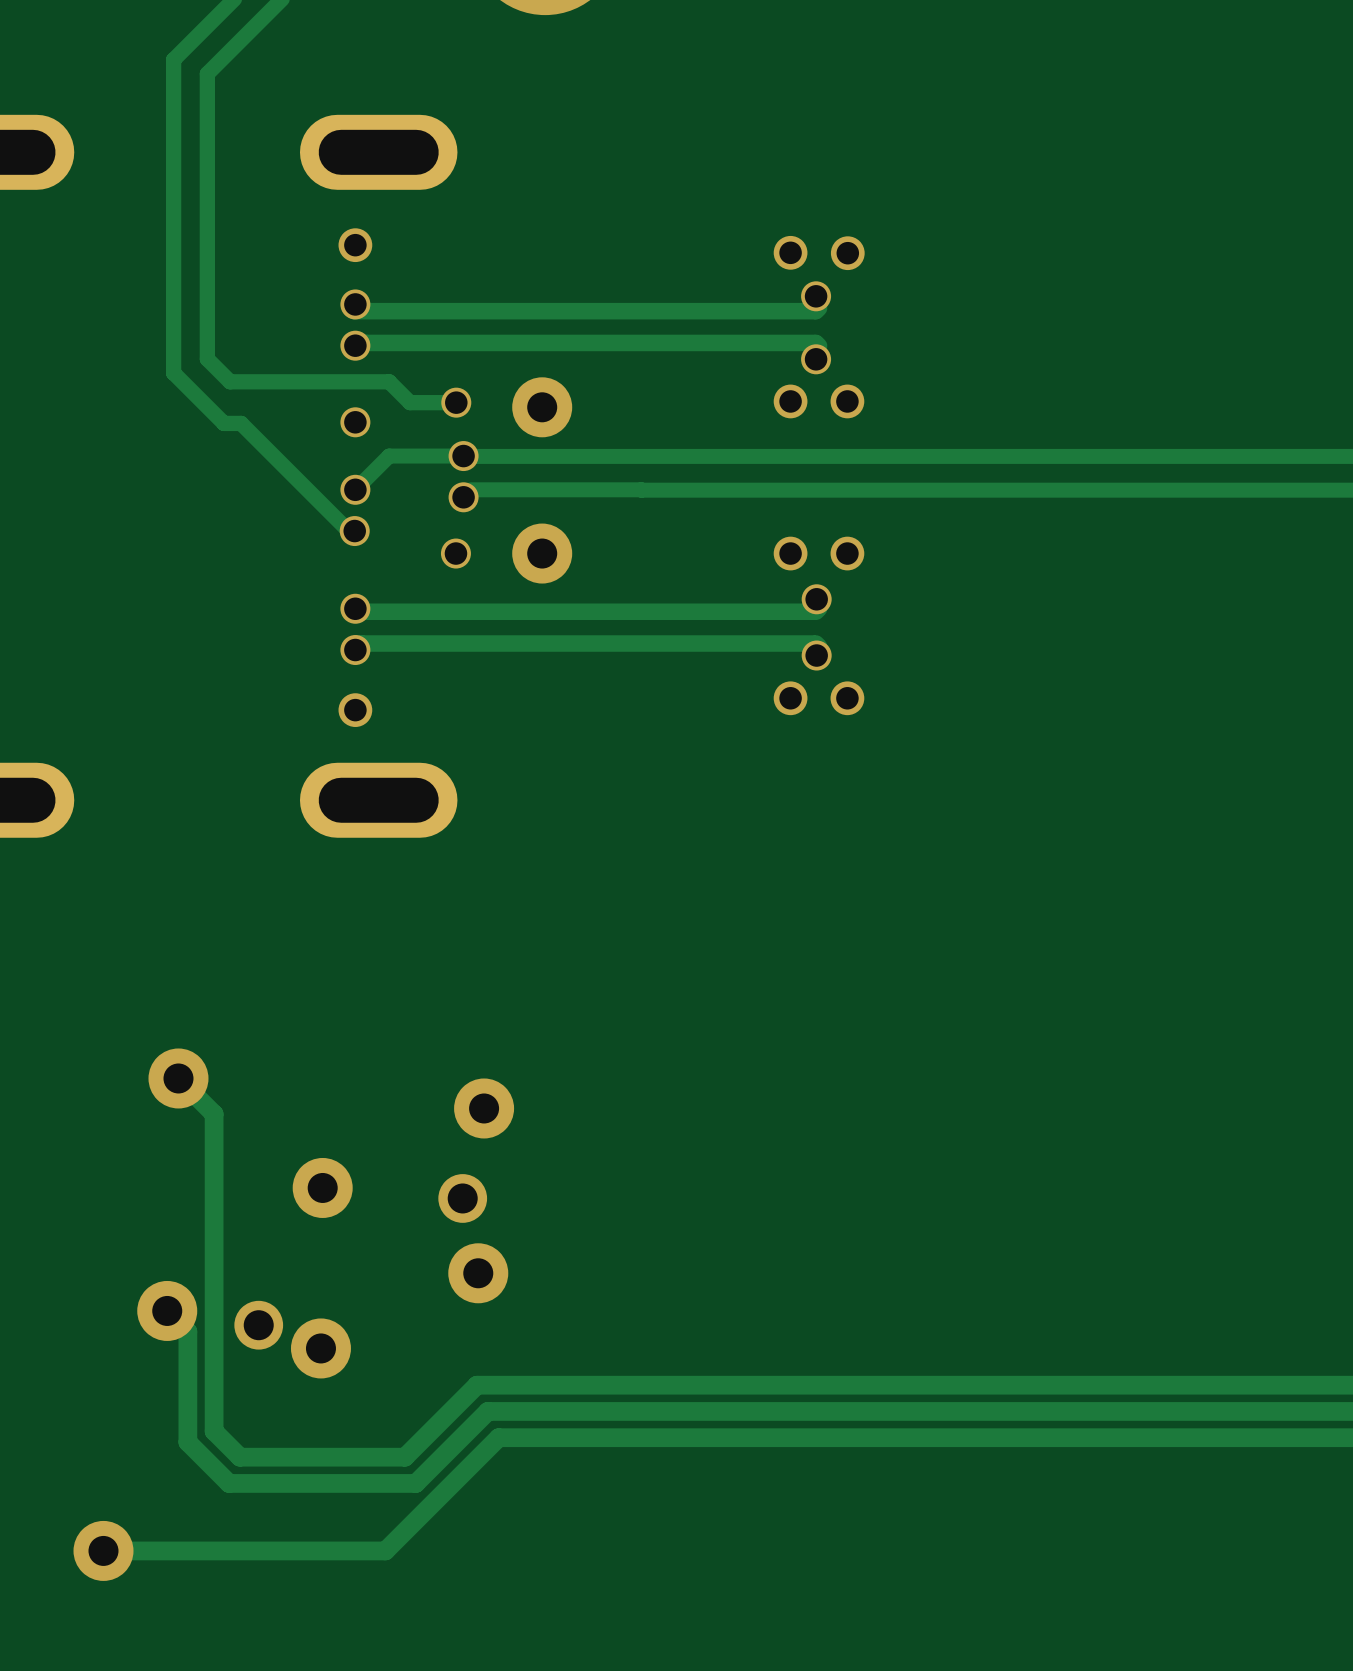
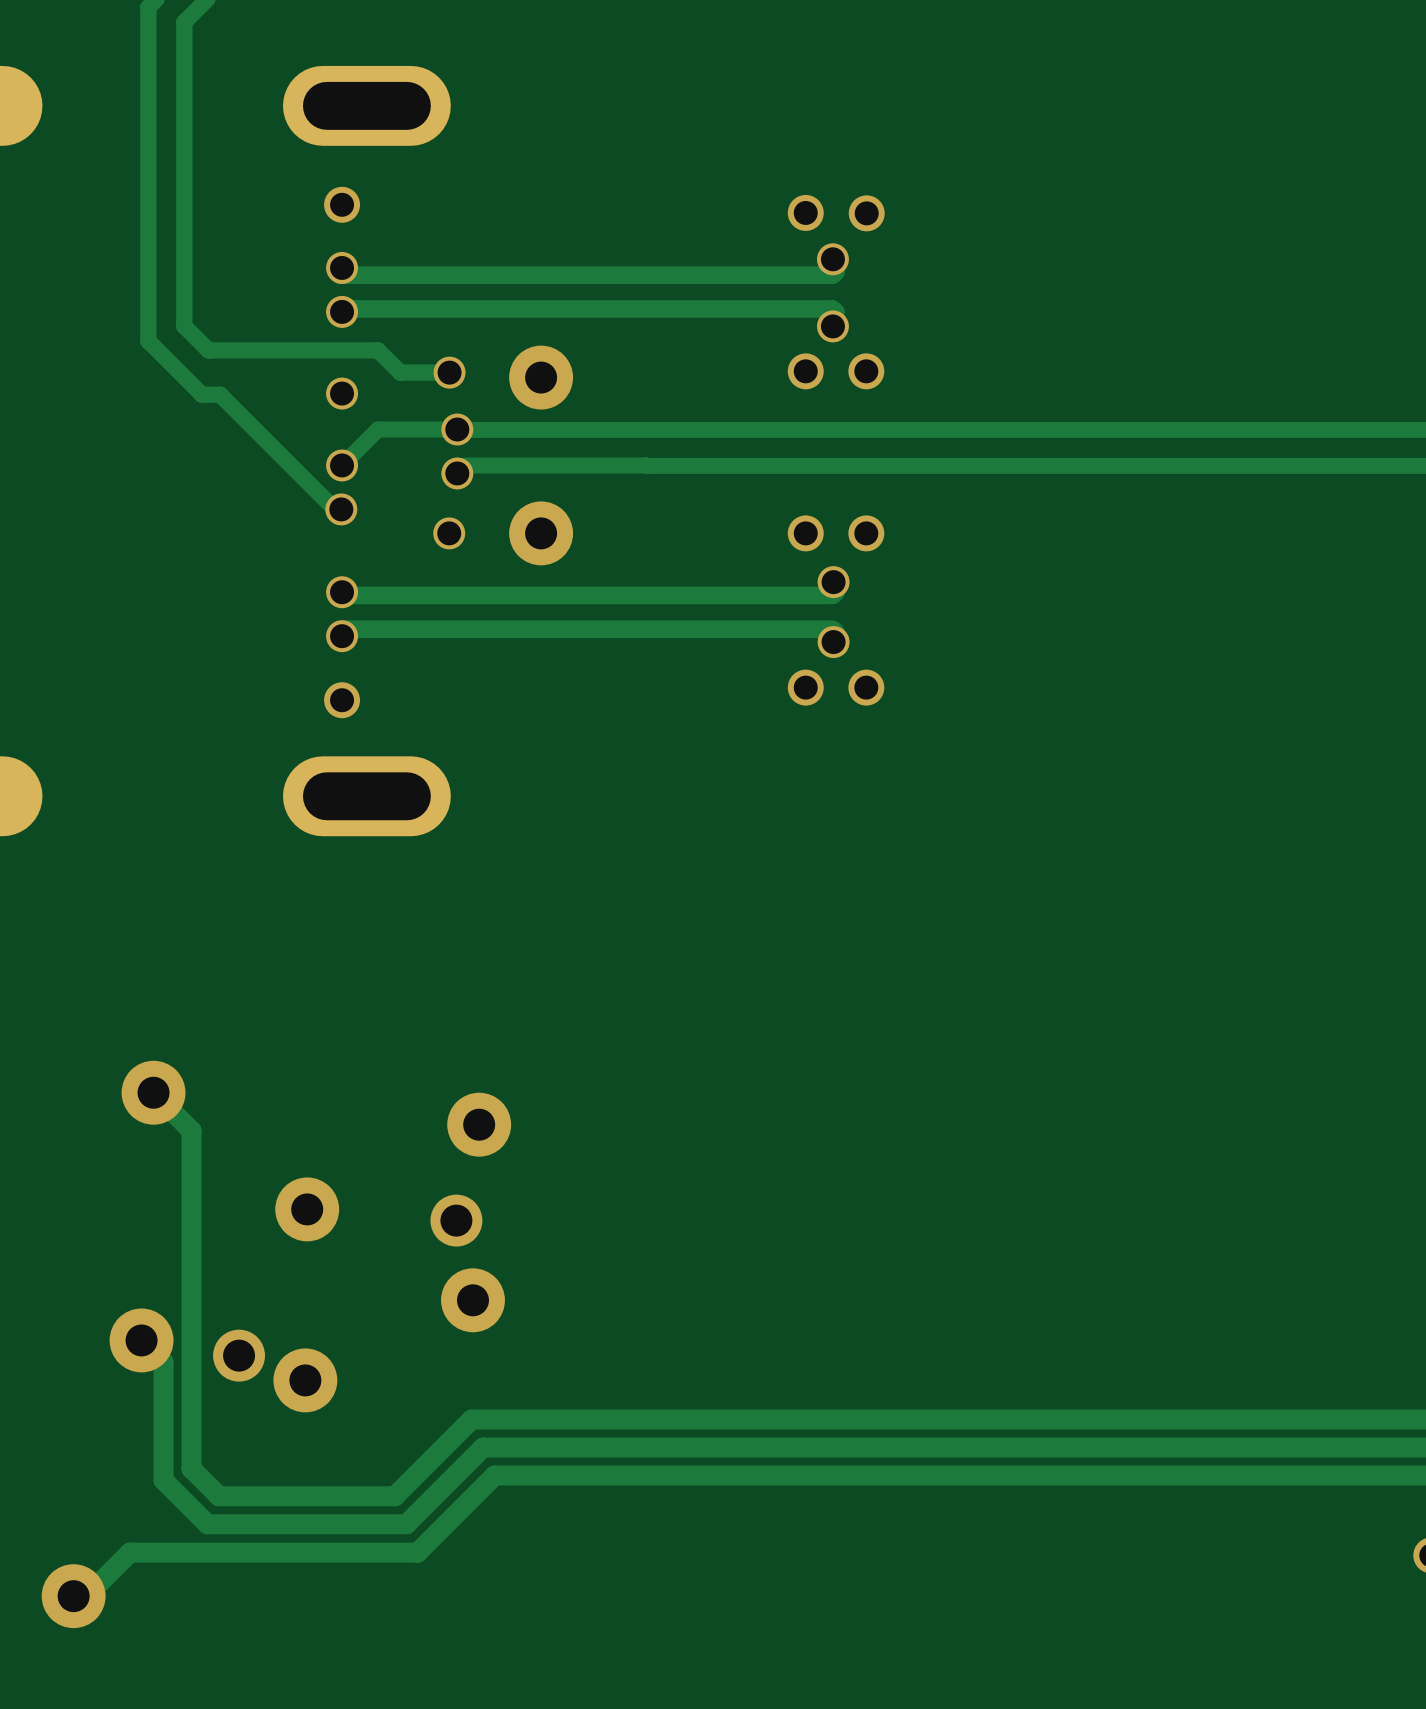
track: (426, 1510) (385, 1550) (115, 1550) -> (417, 1552) (129, 1552) (86, 1596)

